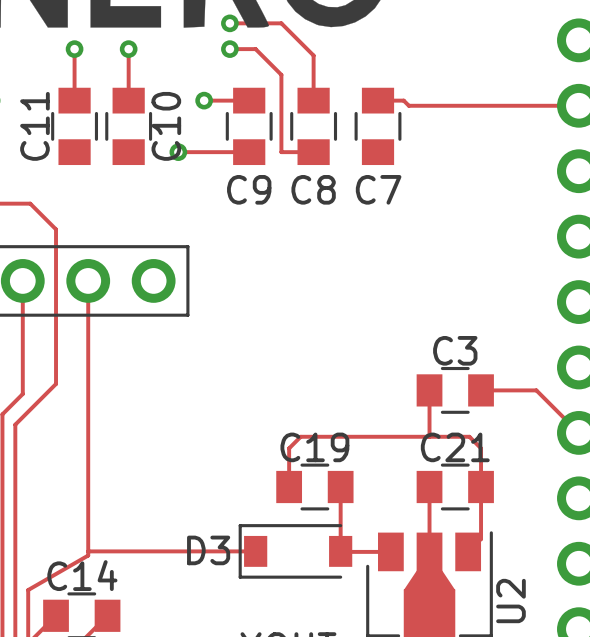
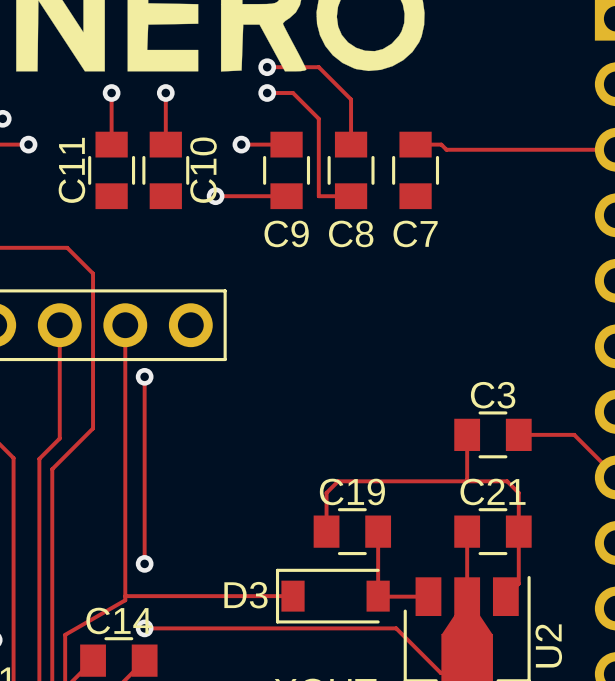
track: none -> (144, 376) (144, 563)
via: none -> (144, 376)
via: none -> (144, 563)
track: none -> (144, 628) (396, 628) (440, 673) (467, 673)
via: none -> (144, 628)

